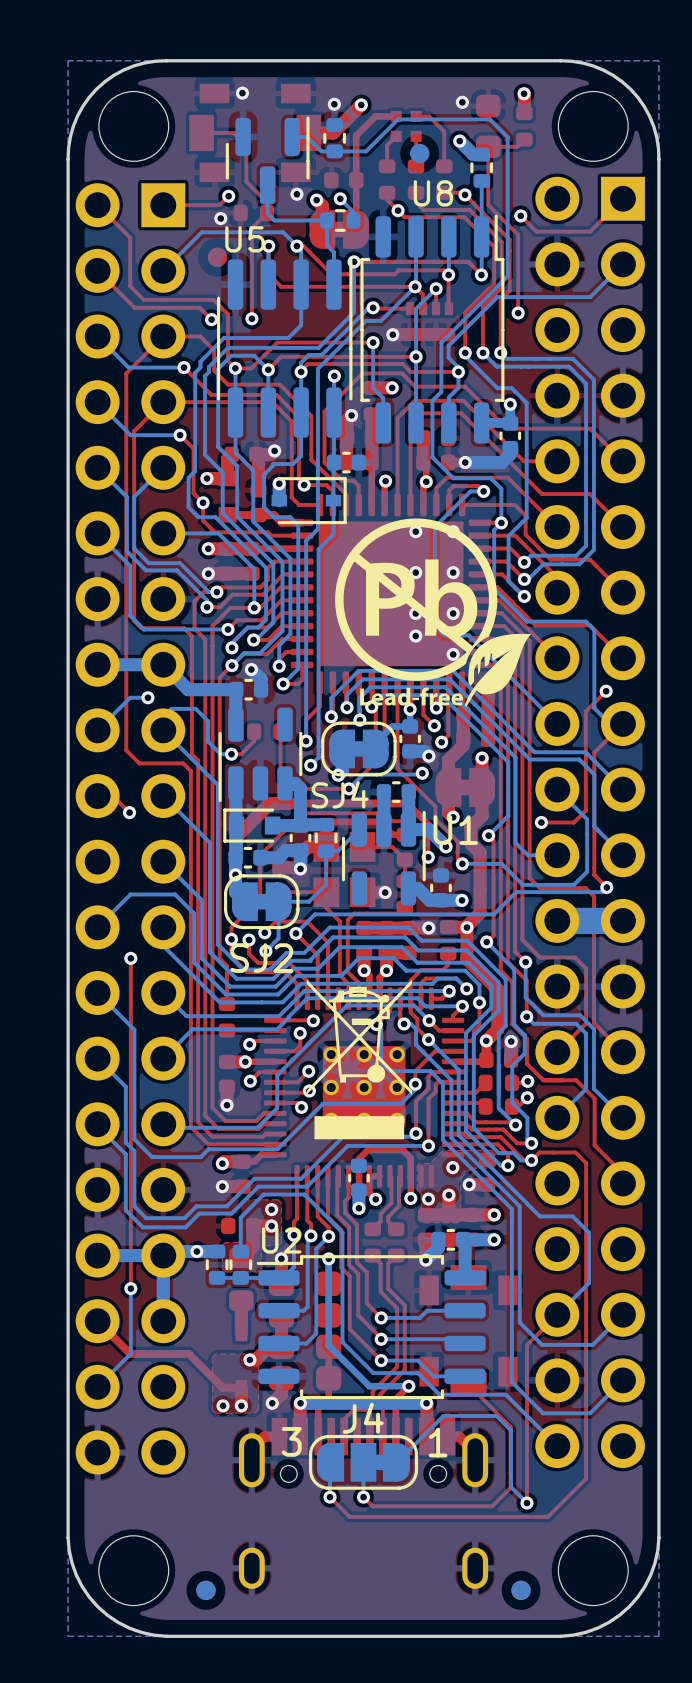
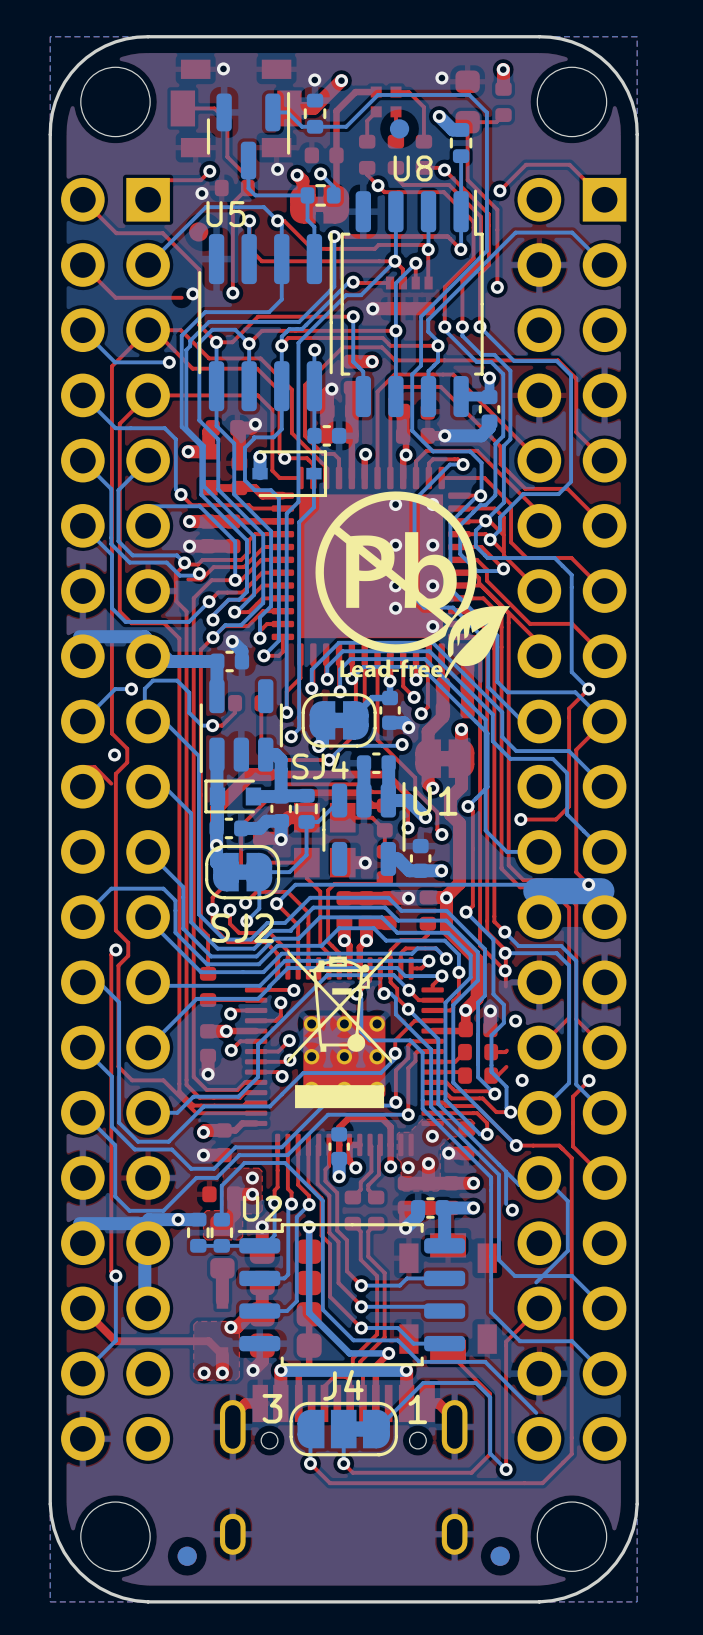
top track: (622, 198) (590, 231) (536, 231) (520, 215) -> (604, 199) (569, 164) (526, 164) (499, 190)
top track: (97, 205) (130, 237) (130, 286) (143, 299) (213, 299) (228, 314) (228, 360) -> (82, 199) (116, 233) (162, 233) (199, 269) (199, 325) (209, 334)
bottom track: (224, 232) (201, 232) (163, 270) -> (205, 207) (148, 264)
bottom track: (622, 264) (590, 297) (497, 297) -> (604, 264) (572, 232) (515, 232) (476, 271)
top track: (97, 270) (134, 307) (199, 307) (211, 319) -> none
top track: none -> (82, 264) (115, 297) (181, 297)
bottom track: (97, 336) (128, 367) (184, 367) -> none
bottom track: (483, 352) (496, 366) (569, 366) (586, 383) (586, 545) (576, 555) (530, 555) (524, 562) -> (462, 326) (462, 335) (481, 354) (494, 354) (510, 370) (510, 439) (503, 445) (503, 502) (475, 530) (475, 546) (487, 558) (554, 558) (571, 574) (571, 672) (588, 689)
bottom track: none -> (82, 330) (115, 362) (169, 362)
bottom track: (506, 358) (572, 358) (593, 379) (593, 549) (579, 564) (543, 564) (528, 579) (524, 579) -> (485, 332) (514, 361) (556, 361) (571, 375) (571, 481) (558, 494) (523, 494) (499, 517) (499, 529) (490, 539)
via position: (184, 367) -> (169, 362)
bottom track: (200, 367) (195, 372) (195, 471) (188, 477) (188, 507) (198, 517) (215, 517) (220, 521) -> (181, 341) (181, 426) (201, 446) (201, 494)
top track: (214, 370) (214, 350) (200, 336) (163, 336) (126, 373) (126, 750) (139, 763) (183, 763) (190, 771) (190, 1126) (208, 1144) (215, 1144) -> (195, 344) (180, 330) (148, 330) (111, 366) (111, 733) (127, 748) (127, 762) (115, 773) (115, 930) (128, 942) (128, 955) (118, 965) (118, 1066) (132, 1080) (163, 1080) (196, 1113)
top track: (465, 386) (507, 428) (590, 428) (622, 461) -> (444, 360) (558, 360) (576, 378) (576, 432) (604, 460)
top track: (463, 400) (524, 461) (557, 461) -> (443, 374) (453, 374) (539, 460)
bottom track: (524, 400) (526, 403) (526, 517) (508, 536) (508, 581) (524, 596) -> (503, 374) (503, 436) (495, 443) (495, 495) (485, 505) (480, 505) (460, 525) (460, 554) (477, 571) (499, 571)
bottom track: (97, 402) (130, 435) (180, 435) -> none
bottom track: none -> (82, 395) (115, 428) (164, 428) (175, 439) (175, 489) (181, 494)
top track: (180, 435) (193, 448) (193, 493) (203, 502) (203, 520) (214, 532) -> (181, 494) (191, 505) (196, 505)
via: (180, 435) -> none
top track: (291, 436) (291, 421) (272, 402) (163, 402) (134, 431) (134, 620) (141, 628) (183, 628) (191, 636) (191, 754) (198, 760) -> (272, 409) (257, 395) (148, 395) (119, 423) (119, 611) (131, 623) (164, 623) (179, 638) (179, 731)
bottom track: (97, 467) (126, 497) (126, 551) (145, 570) (177, 570) (207, 600) (207, 607) -> none
bottom track: (163, 467) (134, 496) (134, 548) (148, 563) (180, 563) (208, 592) (216, 592) -> none
top track: (521, 473) (542, 494) (590, 494) (622, 527) -> (500, 446) (500, 464) (525, 488) (567, 488) (604, 525)
top track: (497, 477) (507, 477) (557, 527) -> (477, 450) (539, 512) (539, 525)
bottom track: none -> (82, 460) (111, 489) (111, 544) (129, 562) (166, 562) (179, 575) (197, 575) (199, 573)
bottom track: none -> (148, 460) (118, 490) (118, 541) (132, 555) (177, 555) (184, 562)
bottom track: (501, 488) (501, 522) (494, 530) (494, 589) (526, 621) (585, 621) (594, 630) (594, 708) (610, 723) (622, 723) -> (480, 461) (481, 491) (450, 522) (450, 588) (497, 635) (497, 681) (507, 692) (575, 692) (604, 721)
via position: (203, 502) -> (181, 494)
top track: (505, 504) (514, 504) (525, 515) (525, 534) (550, 559) (590, 559) (622, 592) -> (484, 478) (511, 504) (511, 542) (526, 558) (571, 558) (604, 591)
bottom track: (97, 533) (130, 565) (130, 582) -> (82, 525) (111, 554)
top track: (515, 535) (557, 577) (557, 592) -> (494, 508) (503, 517) (503, 555) (539, 591)
via: none -> (485, 520)
via: (524, 562) -> none
via: none -> (490, 539)
via: (524, 579) -> none
via: none -> (184, 562)
via: (216, 592) -> none
top track: (507, 597) (535, 625) (590, 625) (622, 658) -> (486, 569) (486, 580) (530, 623) (572, 623) (604, 656)
top track: (494, 600) (499, 600) (557, 658) -> (473, 572) (479, 578) (479, 583) (539, 643) (539, 656)
via: none -> (199, 573)
via: (207, 607) -> none
bottom track: (130, 615) (143, 629) (228, 629) -> (111, 588) (111, 608) (125, 621) (188, 621) (209, 601)
bottom track: (468, 635) (557, 723) -> (448, 607) (453, 607) (488, 642) (488, 687) (522, 721) (539, 721)
top track: (606, 691) (585, 711) (585, 810) (573, 822) (541, 822) -> none
via position: (606, 691) -> (588, 689)
bottom track: (147, 697) (130, 697) (97, 730) -> none
via position: (147, 697) -> (131, 689)
bottom track: none -> (131, 689) (115, 689) (82, 721)
top track: none -> (588, 689) (569, 708) (569, 806) (556, 819) (520, 819)
top track: (622, 723) (594, 752) (594, 875) (606, 887) -> none
bottom track: (523, 740) (534, 752) (585, 752) (622, 789) -> (502, 712) (502, 737) (516, 751) (568, 751) (604, 786)
bottom track: (513, 743) (530, 759) (579, 759) (594, 774) (594, 826) (622, 855) -> (492, 714) (492, 741) (510, 758) (552, 758) (567, 773) (567, 814) (604, 851)
bottom track: (506, 748) (515, 757) (515, 842) (527, 855) (557, 855) -> (485, 719) (485, 830) (506, 851) (539, 851)
top track: none -> (604, 721) (576, 749) (576, 872) (588, 884)
bottom track: (557, 789) (587, 819) (587, 871) (573, 884) (522, 884) (501, 863) (462, 863) -> none
via position: (129, 812) -> (114, 754)
via position: (541, 822) -> (520, 819)
part position: (590, 822) -> (571, 819)
part position: (130, 828) -> (115, 819)
bottom track: (163, 861) (202, 900) (202, 916) -> (148, 851) (183, 887)
top track: (529, 877) (539, 888) (585, 888) (593, 896) (593, 1023) (622, 1052) -> (508, 848) (508, 865) (523, 880) (551, 880) (576, 904) (576, 1019) (604, 1047)
bottom track: (606, 887) (602, 892) (516, 892) (493, 914) -> (588, 884) (473, 884)
via position: (606, 887) -> (588, 884)
top track: (522, 898) (522, 939) (540, 957) (574, 957) (586, 968) (586, 1023) (557, 1052) -> (501, 868) (520, 887) (548, 887) (569, 907) (569, 1017) (539, 1047)
bottom track: (97, 927) (130, 894) (175, 894) (194, 913) (194, 930) -> (82, 917) (111, 888) (163, 888) (175, 900)
top track: (130, 958) (130, 1288) -> none
via position: (130, 958) -> (115, 949)
bottom track: (525, 962) (525, 997) (543, 1015) (580, 1015) (593, 1029) (593, 1088) (622, 1117) -> (504, 932) (518, 946) (561, 946) (576, 961) (576, 1084) (604, 1112)
top track: (500, 970) (512, 982) (512, 1024) (526, 1038) (526, 1063) (543, 1080) (576, 1080) (594, 1098) (594, 1145) (622, 1173) (622, 1183) -> (480, 940) (480, 945) (505, 970)
top track: none -> (115, 949) (111, 954) (111, 1271) (115, 1276)
bottom track: none -> (505, 953) (556, 953) (569, 965) (569, 1083) (539, 1112)
via: none -> (505, 953)
bottom track: (526, 1016) (533, 1023) (576, 1023) (586, 1033) (586, 1089) (557, 1117) -> none
via position: (526, 1016) -> (505, 970)
bottom track: (134, 1029) (134, 1139) (152, 1157) (200, 1157) (208, 1149) (277, 1149) (289, 1137) -> (116, 999) (119, 1002) (119, 1122) (138, 1141) (168, 1141) (203, 1106) (269, 1106)
bottom track: (215, 1029) (192, 1029) (163, 1058) -> (196, 998) (148, 1047)
via: none -> (515, 1021)
bottom track: (97, 1058) (125, 1086) (125, 1142) (134, 1151) (134, 1206) (146, 1218) (184, 1218) (196, 1206) (226, 1206) (232, 1200) -> (82, 1047) (111, 1076) (111, 1126) (134, 1149) (171, 1149) (191, 1168) (214, 1168)
via: (527, 1081) -> none
via: (527, 1097) -> none
via: none -> (522, 1080)
top track: none -> (589, 1080) (573, 1096) (573, 1146) (604, 1177)
via: none -> (589, 1080)
bottom track: (473, 1113) (473, 1128) (498, 1153) (513, 1153) (521, 1160) (531, 1160) -> (453, 1082) (516, 1145)
bottom track: (97, 1124) (125, 1154) (125, 1210) (142, 1227) (185, 1227) (199, 1213) (231, 1213) (235, 1209) -> (82, 1112) (115, 1145) (115, 1196) (129, 1210) (163, 1210) (196, 1177) (216, 1177)
bottom track: (163, 1124) (166, 1127) (212, 1127) -> (148, 1112) (177, 1112) (193, 1096)
top track: (497, 1137) (500, 1137) (524, 1160) (531, 1160) (539, 1152) (575, 1152) (586, 1163) (586, 1478) (547, 1516) -> (476, 1106) (516, 1145) (559, 1145) (571, 1157) (571, 1454) (542, 1483) (526, 1483)
via position: (531, 1160) -> (516, 1145)
via: none -> (512, 1210)
bottom track: (130, 1288) (130, 1353) (97, 1386) -> (115, 1276) (115, 1340) (82, 1373)
via position: (130, 1288) -> (115, 1276)
bottom track: (519, 1292) (519, 1322) (542, 1344) (592, 1344) (622, 1314) -> (498, 1260) (514, 1276) (572, 1276) (604, 1308)
top track: (557, 1314) (526, 1345) (526, 1374) -> (539, 1308) (506, 1341)
top track: (97, 1321) (130, 1354) (188, 1354) (222, 1387) (241, 1387) -> (82, 1308) (115, 1341) (208, 1341) (222, 1354)
bottom track: (511, 1344) (511, 1382) (543, 1413) (590, 1413) (622, 1380) -> (491, 1312) (520, 1341) (572, 1341) (604, 1373)

